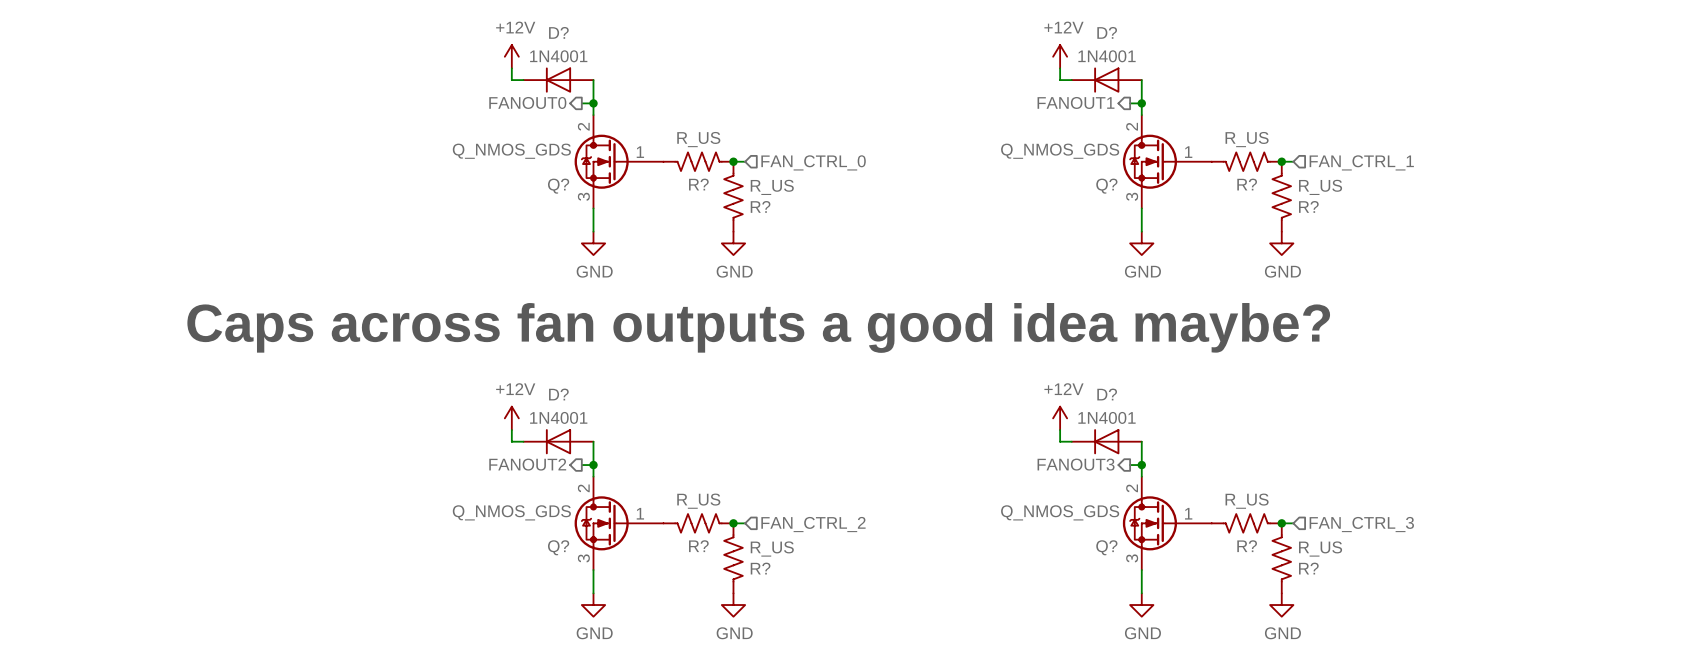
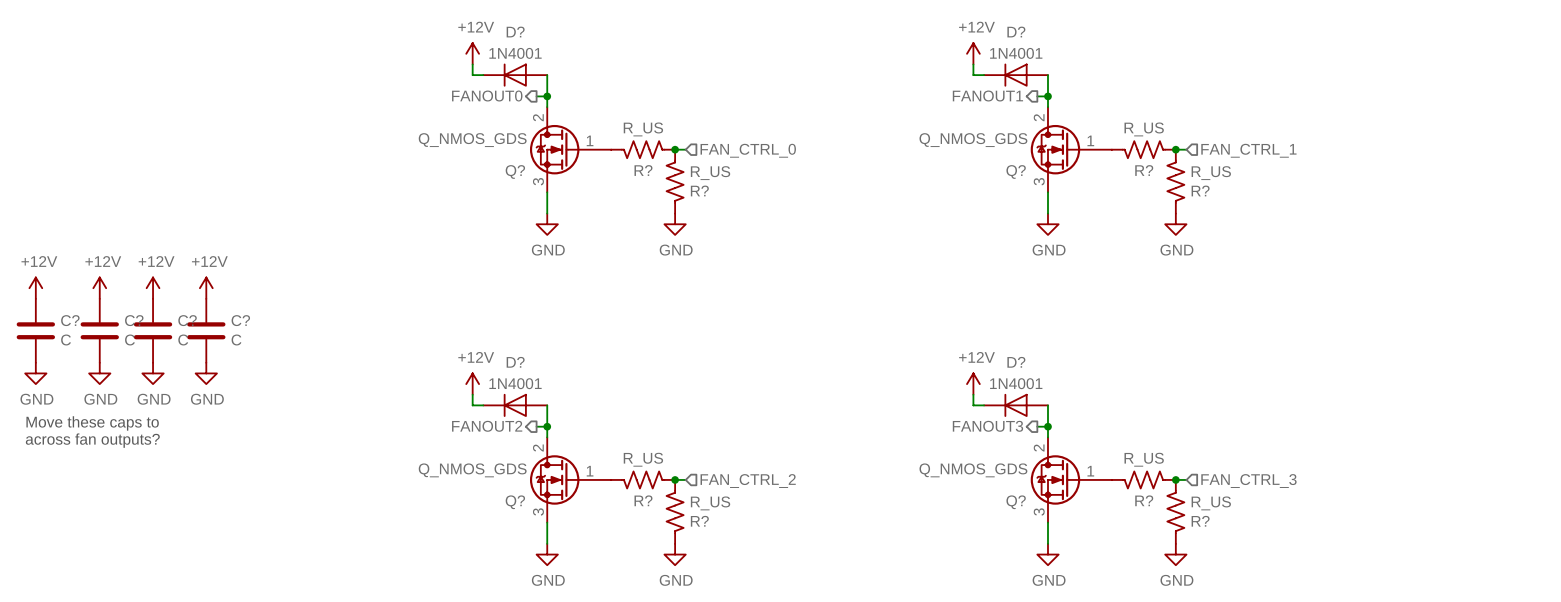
power symbol: none -> +12V (35, 288)
power symbol: none -> +12V (99, 288)
power symbol: none -> +12V (153, 288)
power symbol: none -> +12V (206, 288)
text: Caps across fan outputs a good idea maybe? (758, 327) -> none
C?: none -> C (35, 330)
C?: none -> C (99, 330)
C?: none -> C (153, 330)
C?: none -> C (206, 330)
power symbol: none -> GND (35, 373)
power symbol: none -> GND (99, 373)
power symbol: none -> GND (153, 373)
power symbol: none -> GND (206, 373)
text: none -> Move these caps to (92, 423)
text: none -> across fan outputs? (92, 440)

